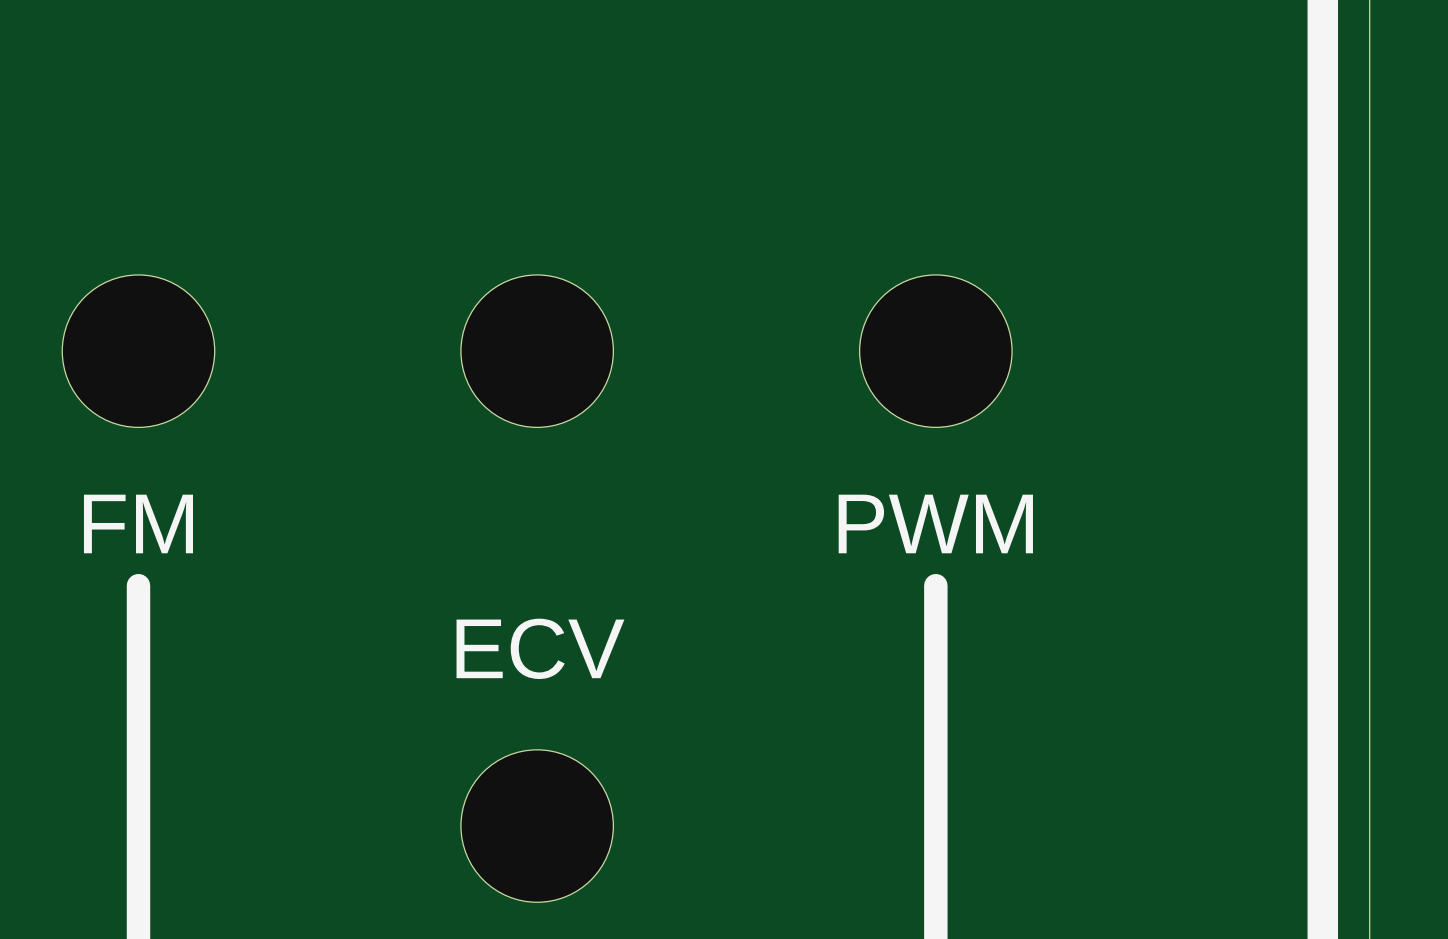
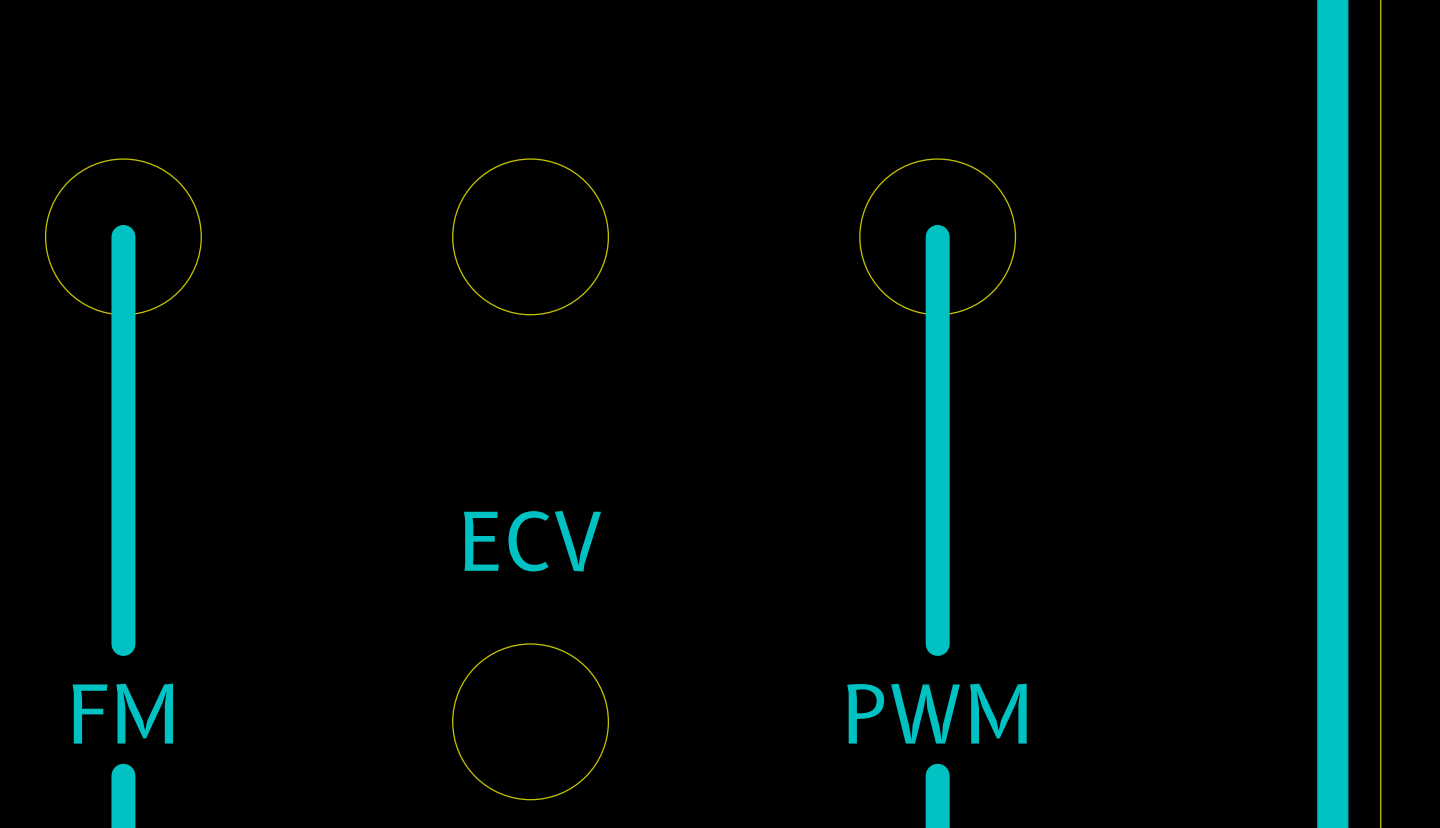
line: none -> (123, 236) (123, 476)
line: none -> (937, 236) (937, 476)
text position: FM (138, 523) -> FM (122, 713)
text position: PWM (935, 523) -> PWM (936, 713)
line: (138, 749) (138, 878) -> none
line: (935, 749) (935, 878) -> none

